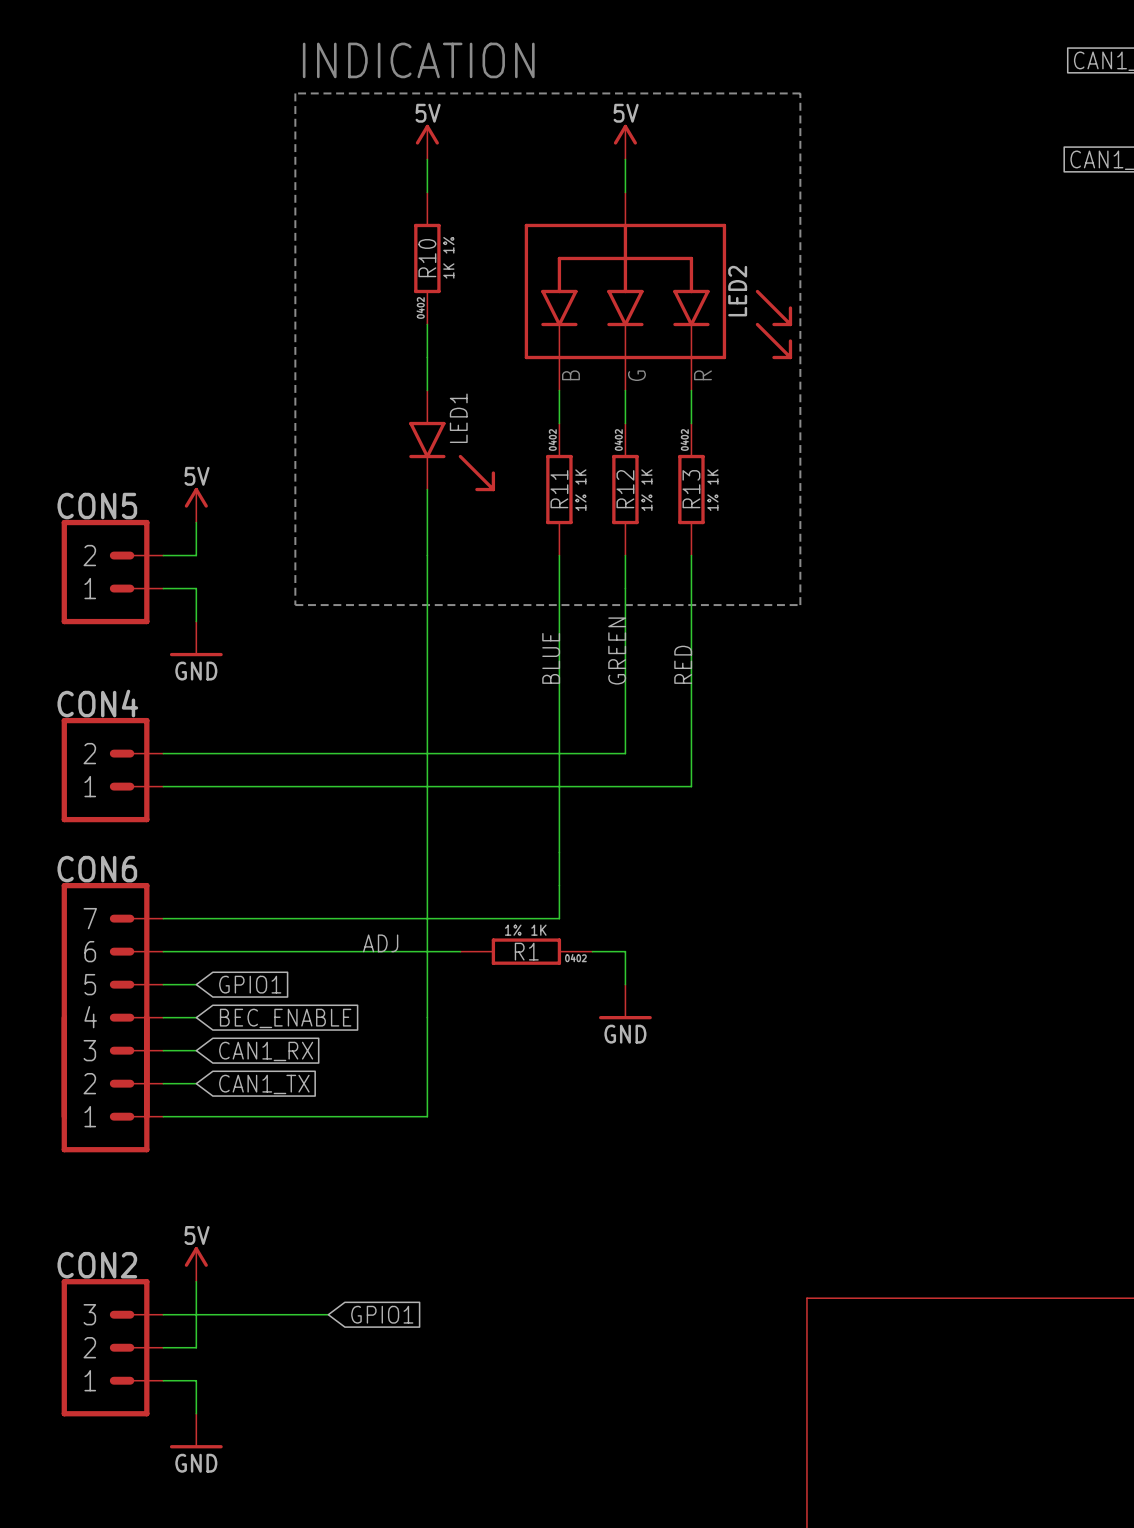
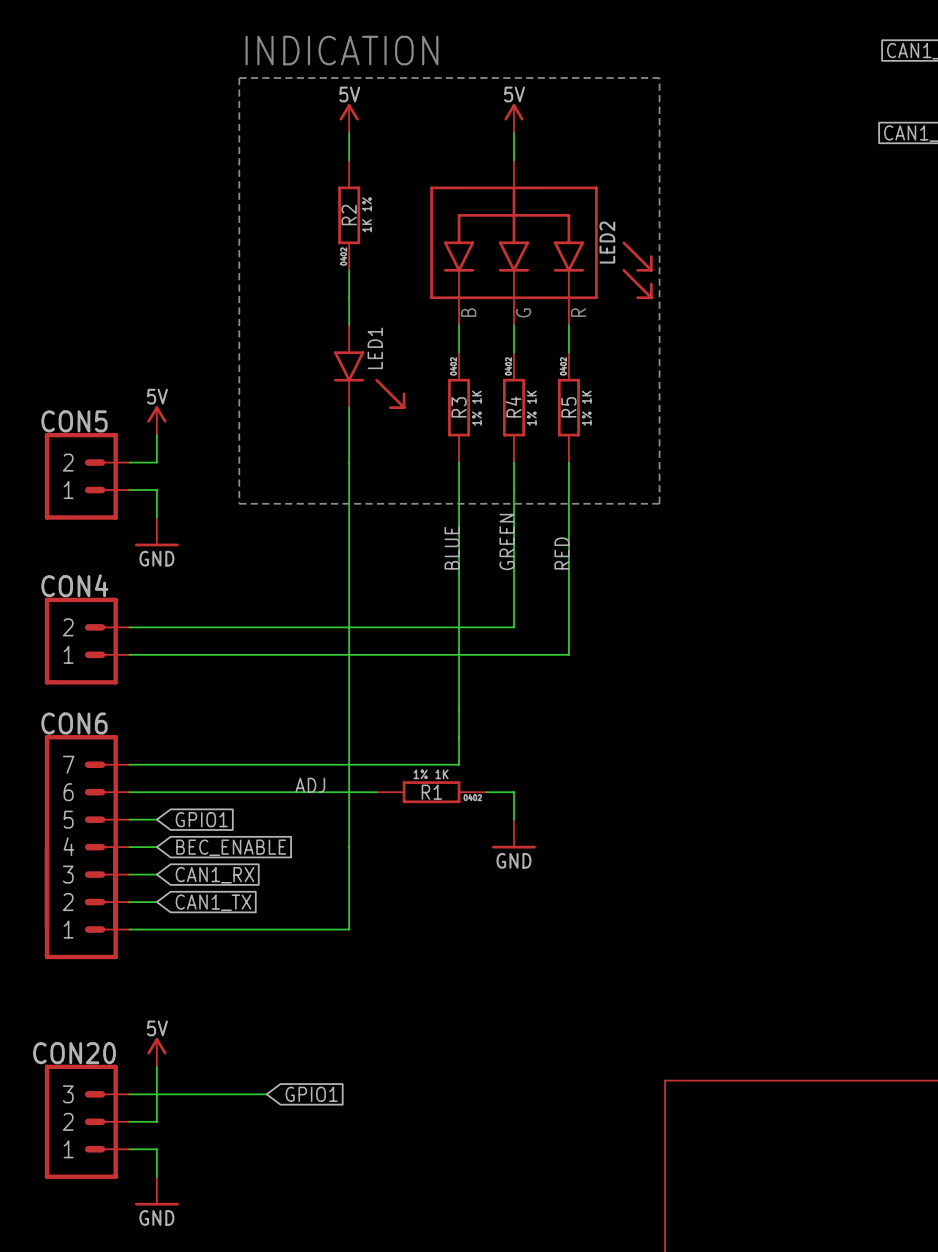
R10 name: R10 (427, 258) -> R2 (349, 215)
R11 name: R11 (559, 489) -> R3 (459, 407)
R12 name: R12 (625, 489) -> R4 (513, 407)
R13 name: R13 (691, 489) -> R5 (568, 407)
CON2 name: CON2 (97, 1265) -> CON20 (74, 1053)

